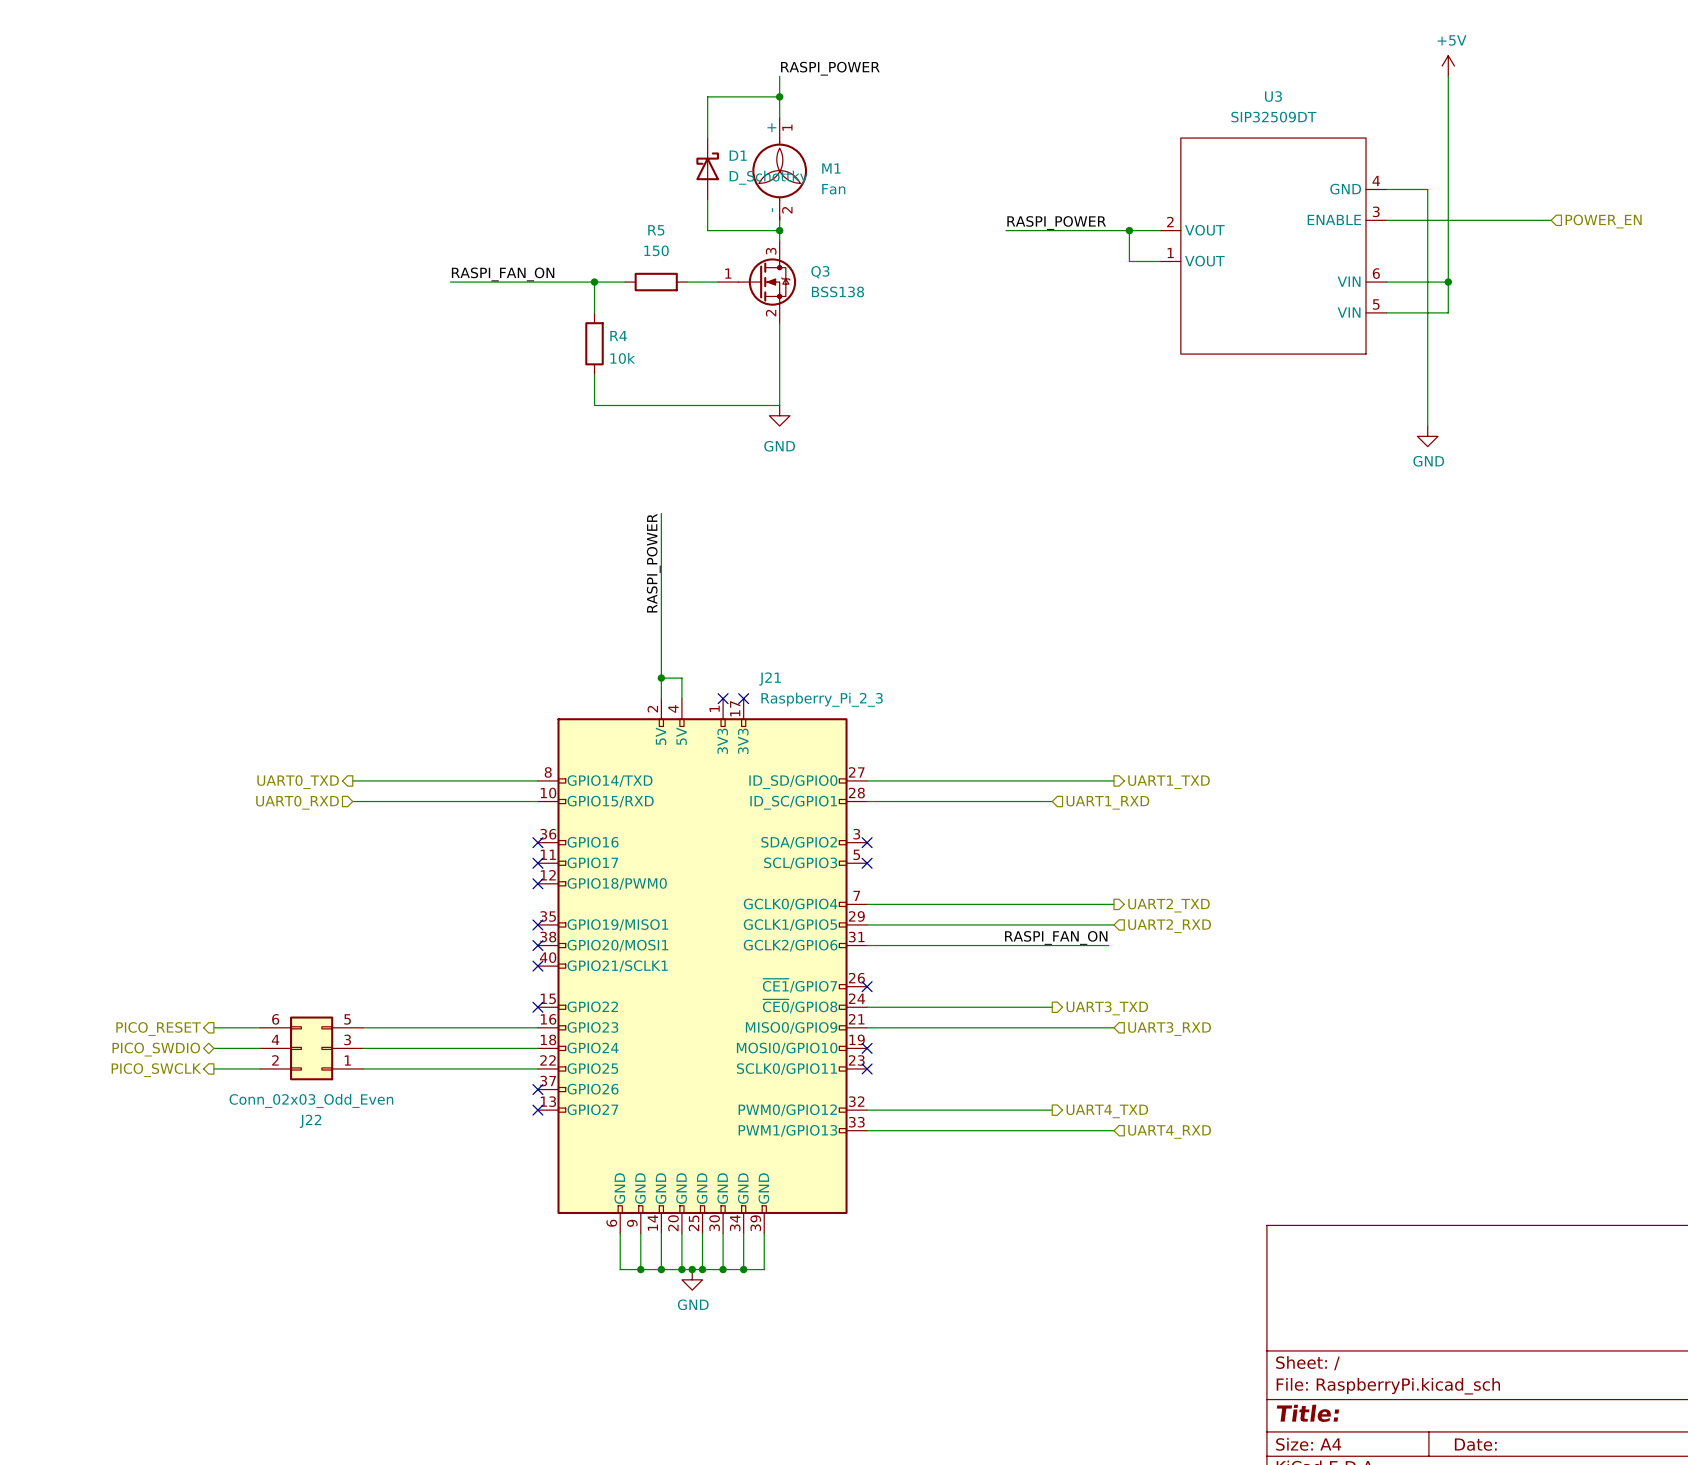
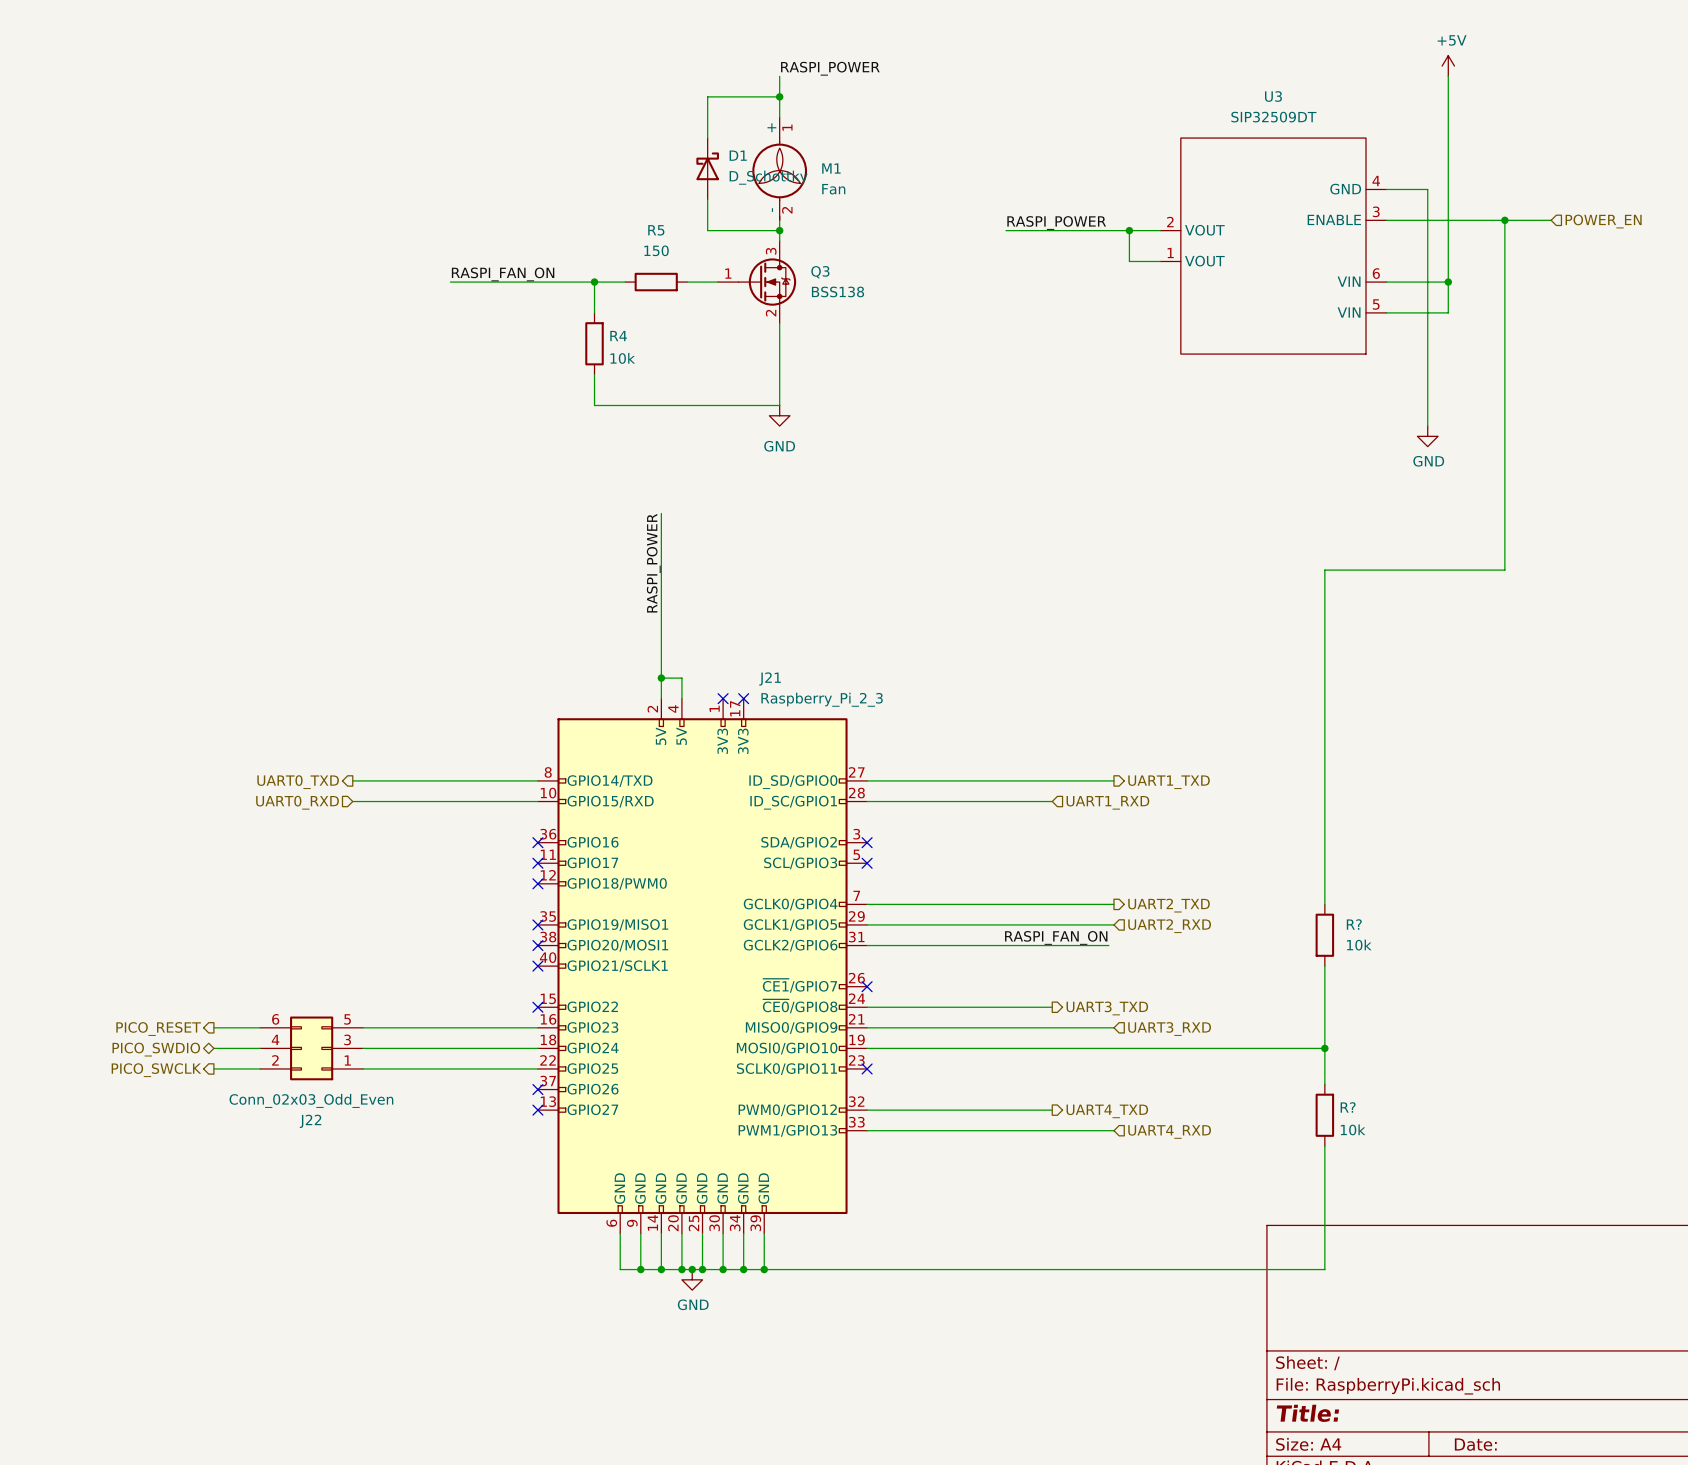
wire: none -> (1504, 220) (1504, 570) (1324, 570) (1324, 904)
junction: none -> (1504, 220)
R?: none -> 10k (1324, 935)
wire: none -> (1324, 966) (1324, 1084)
wire: none -> (867, 1048) (1324, 1048)
no-connect mark: (867, 1048) -> none
junction: none -> (1324, 1048)
R?: none -> 10k (1324, 1115)
wire: none -> (1324, 1146) (1324, 1269) (764, 1269)
junction: none -> (764, 1269)

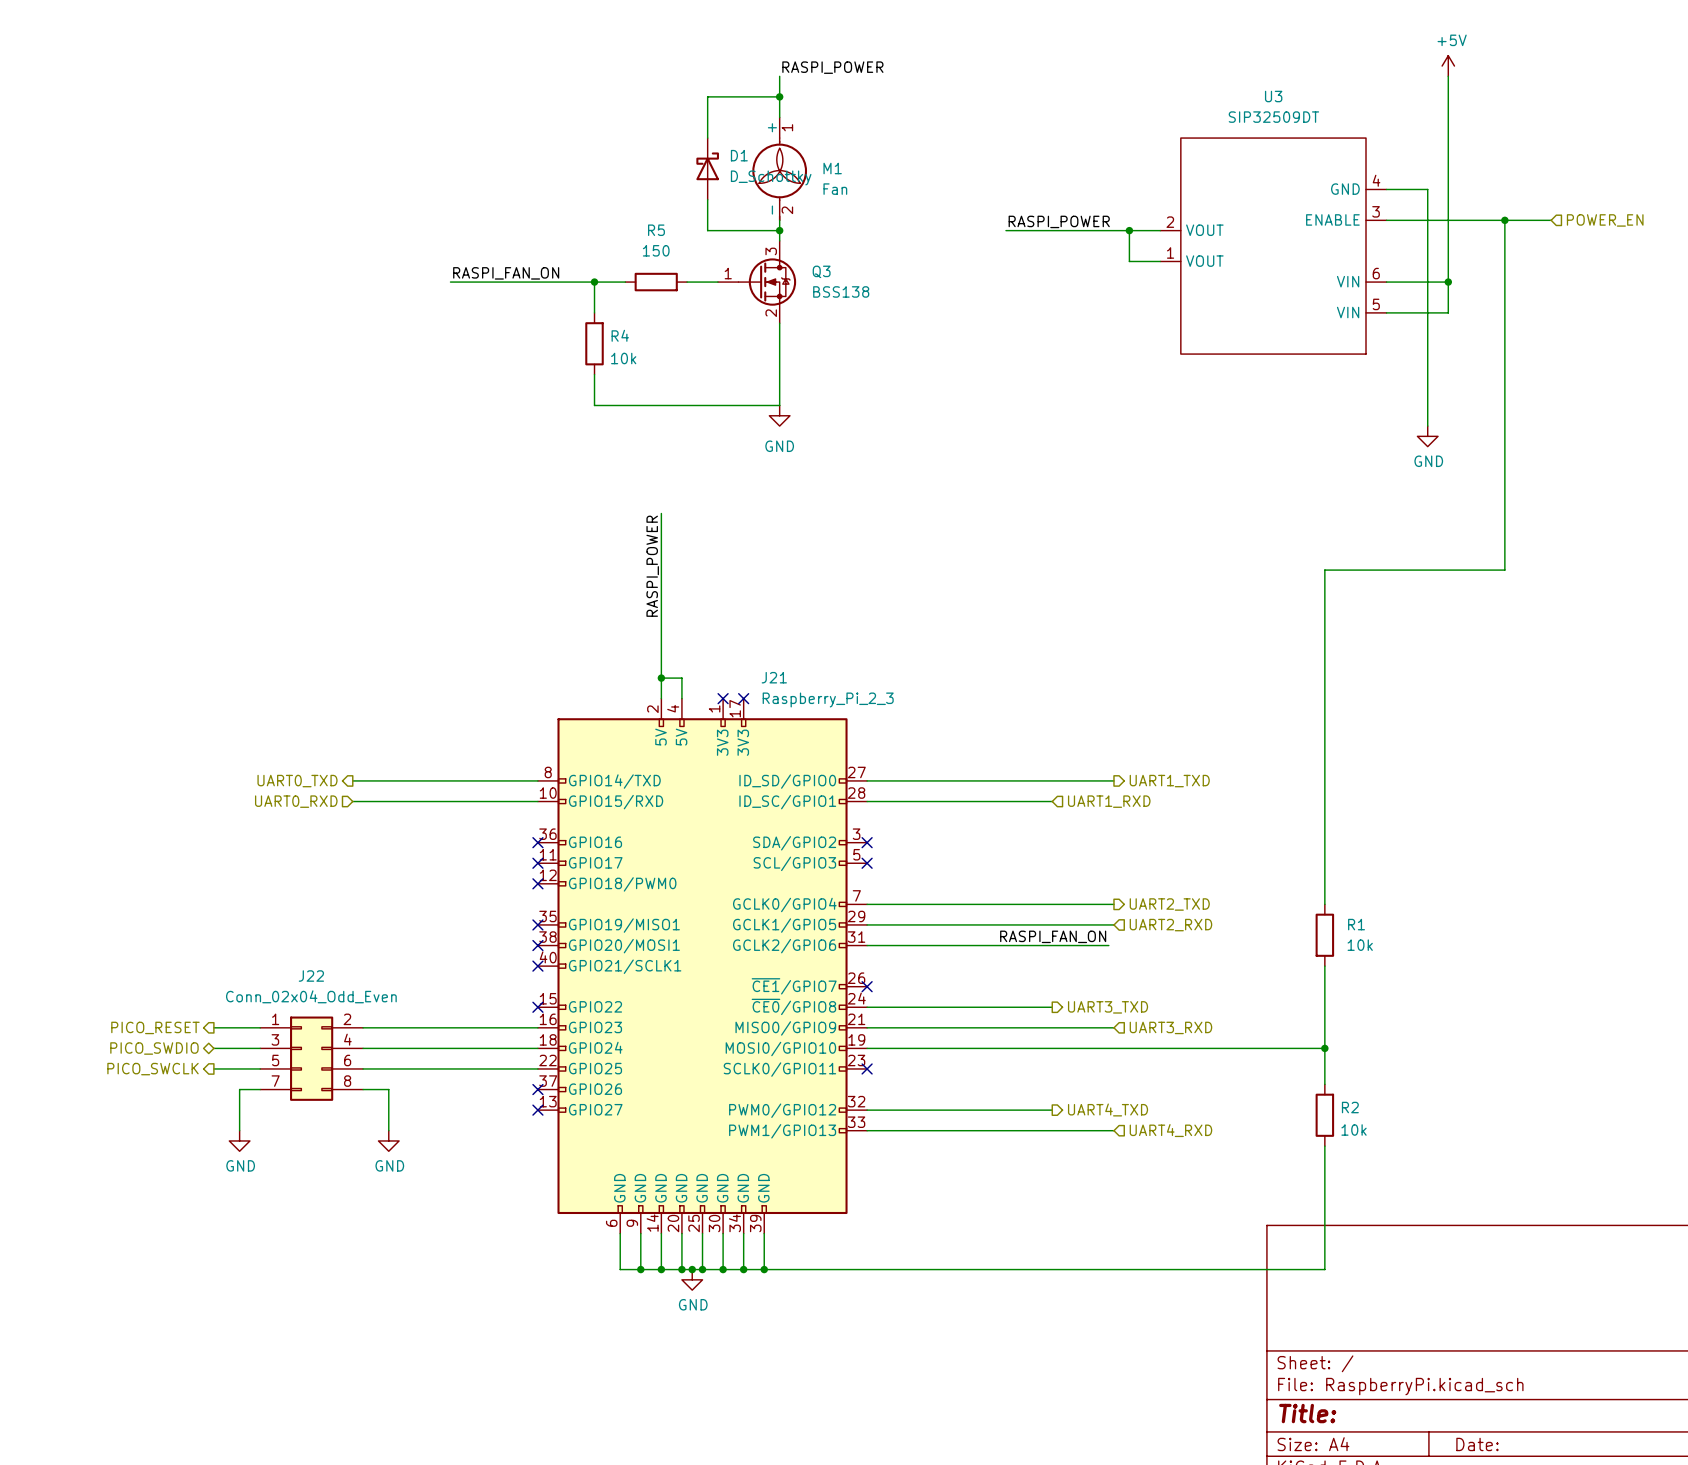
R? name: R? (1354, 924) -> R1 (1356, 924)
J22 symbol: [260, 1016, 364, 1081] -> [260, 1016, 364, 1101]
wire: none -> (260, 1089) (239, 1089) (239, 1130)
wire: none -> (363, 1089) (388, 1089) (388, 1130)
J22 value: Conn_02x03_Odd_Even (311, 1100) -> Conn_02x04_Odd_Even (311, 996)
R? name: R? (1348, 1107) -> R2 (1350, 1107)
J22 name position: J22 (310, 1121) -> J22 (311, 976)
power symbol: none -> GND (239, 1140)
power symbol: none -> GND (388, 1140)

